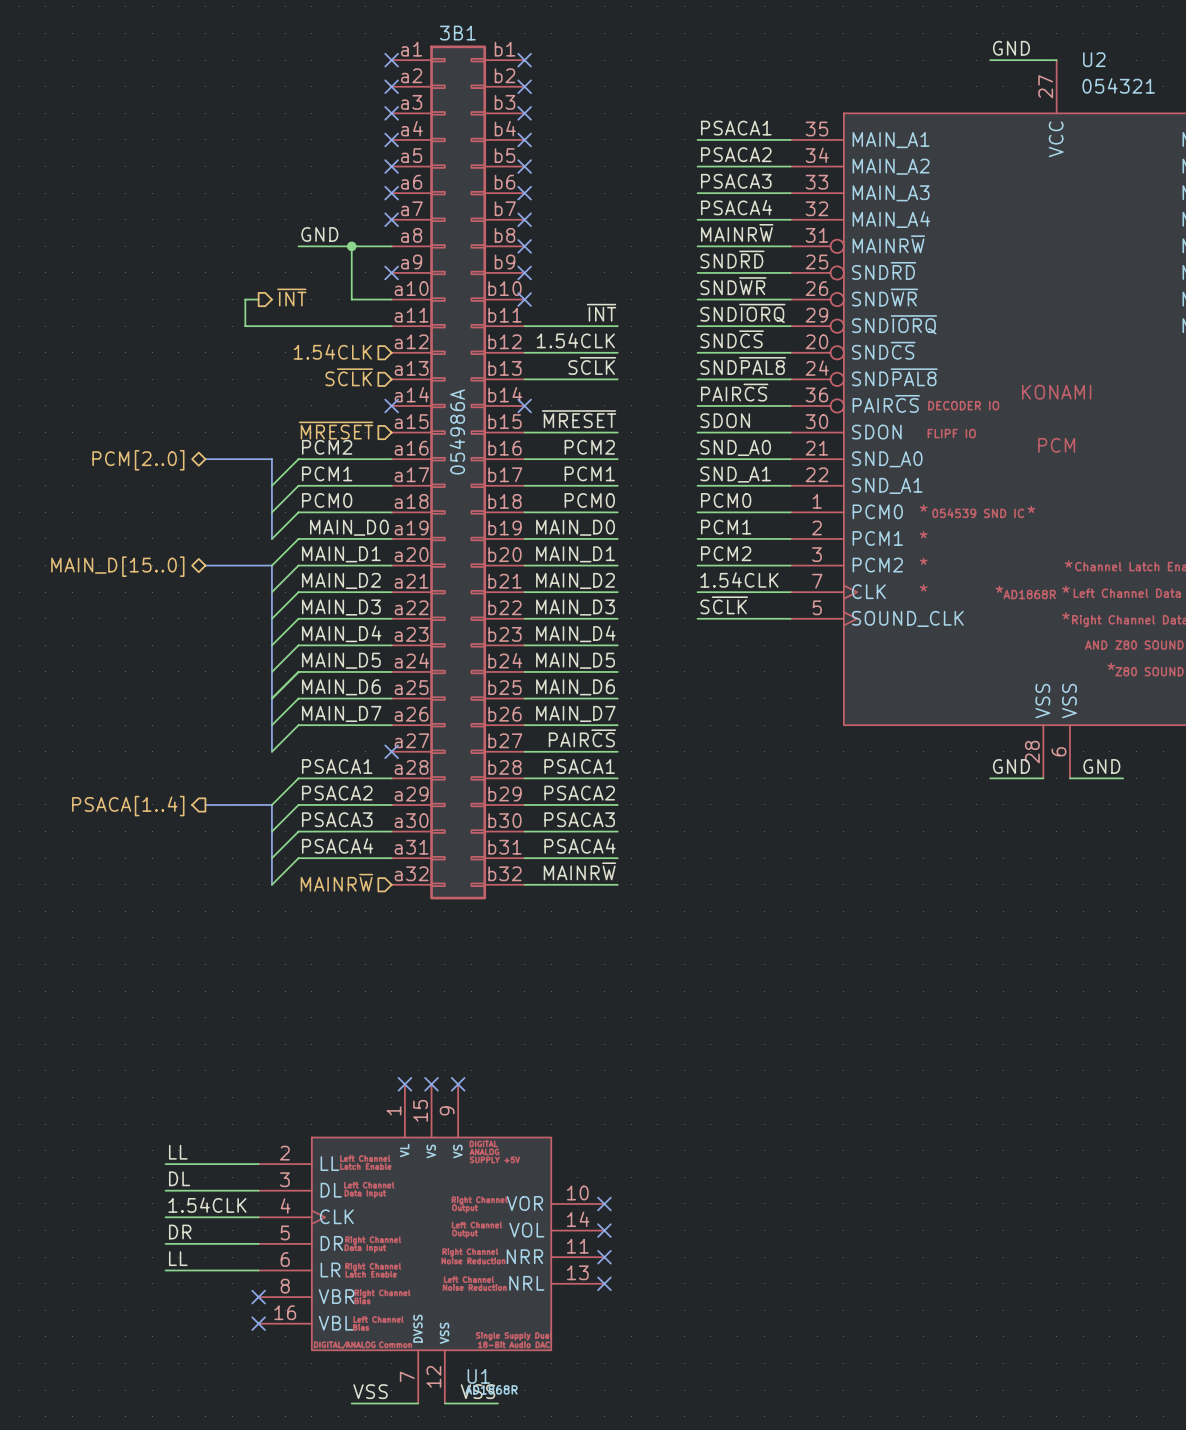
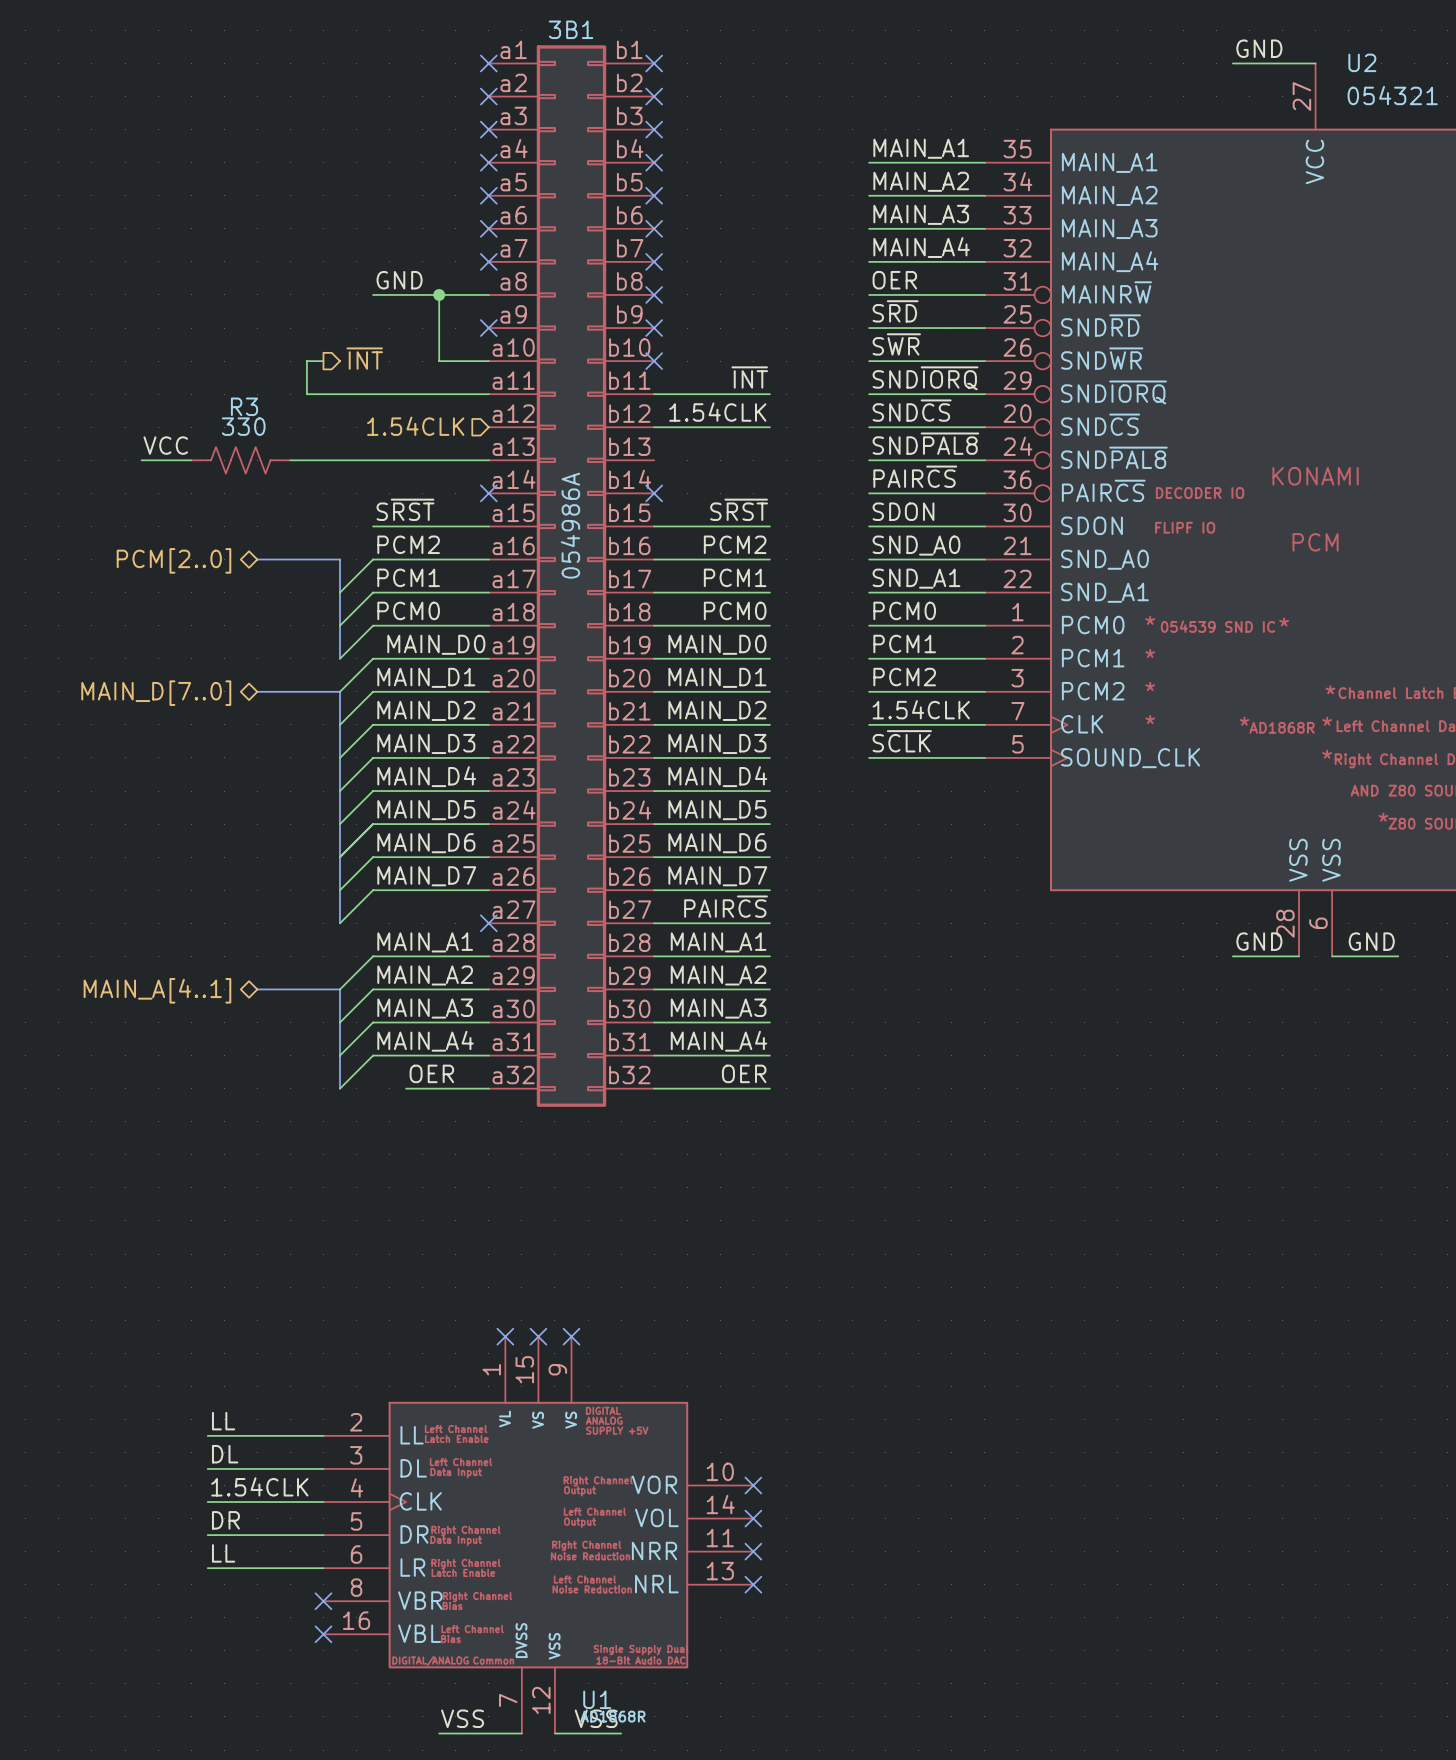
label: PSACA1 (736, 128) -> MAIN_A1 (921, 148)
label: PSACA2 (736, 154) -> MAIN_A2 (921, 181)
label: PSACA3 (736, 181) -> MAIN_A3 (921, 214)
label: PSACA4 (736, 207) -> MAIN_A4 (921, 247)
label: MAINR~{W} (737, 232) -> OER (894, 280)
label: SND~{RD} (732, 259) -> S~{RD} (895, 311)
label: SND~{WR} (733, 286) -> S~{WR} (896, 344)
label: S~{CLK} (592, 365) -> none
label: none -> VCC (165, 445)
hierarchical label: S~{CLK} (349, 377) -> none
wire: none -> (141, 460) (191, 460)
R3: none -> 330 (240, 460)
wire: none -> (290, 460) (488, 460)
wire: (524, 379) (617, 379) -> (373, 526) (488, 526)
label: none -> S~{RST} (405, 509)
label: ~{MRESET} (579, 419) -> S~{RST} (739, 509)
hierarchical label: ~{MRESET} (336, 430) -> none
hierarchical label: MAIN_D[15..0] (117, 566) -> MAIN_D[7..0] (156, 693)
label: PSACA1 (337, 766) -> MAIN_A1 (425, 942)
label: PSACA1 (579, 766) -> MAIN_A1 (718, 942)
label: PSACA2 (337, 793) -> MAIN_A2 (425, 975)
label: PSACA2 (579, 793) -> MAIN_A2 (718, 975)
hierarchical label shape: output (128, 806) -> bidirectional (157, 990)
hierarchical label: PSACA[1..4] (128, 806) -> MAIN_A[4..1] (157, 990)
label: PSACA3 (337, 819) -> MAIN_A3 (425, 1008)
label: PSACA3 (579, 819) -> MAIN_A3 (718, 1008)
label: PSACA4 (337, 845) -> MAIN_A4 (425, 1041)
label: PSACA4 (579, 845) -> MAIN_A4 (719, 1041)
label: MAINR~{W} (579, 871) -> OER (744, 1073)
label: none -> OER (431, 1073)
hierarchical label: MAINR~{W} (336, 882) -> none
wire: none -> (406, 1088) (488, 1088)

